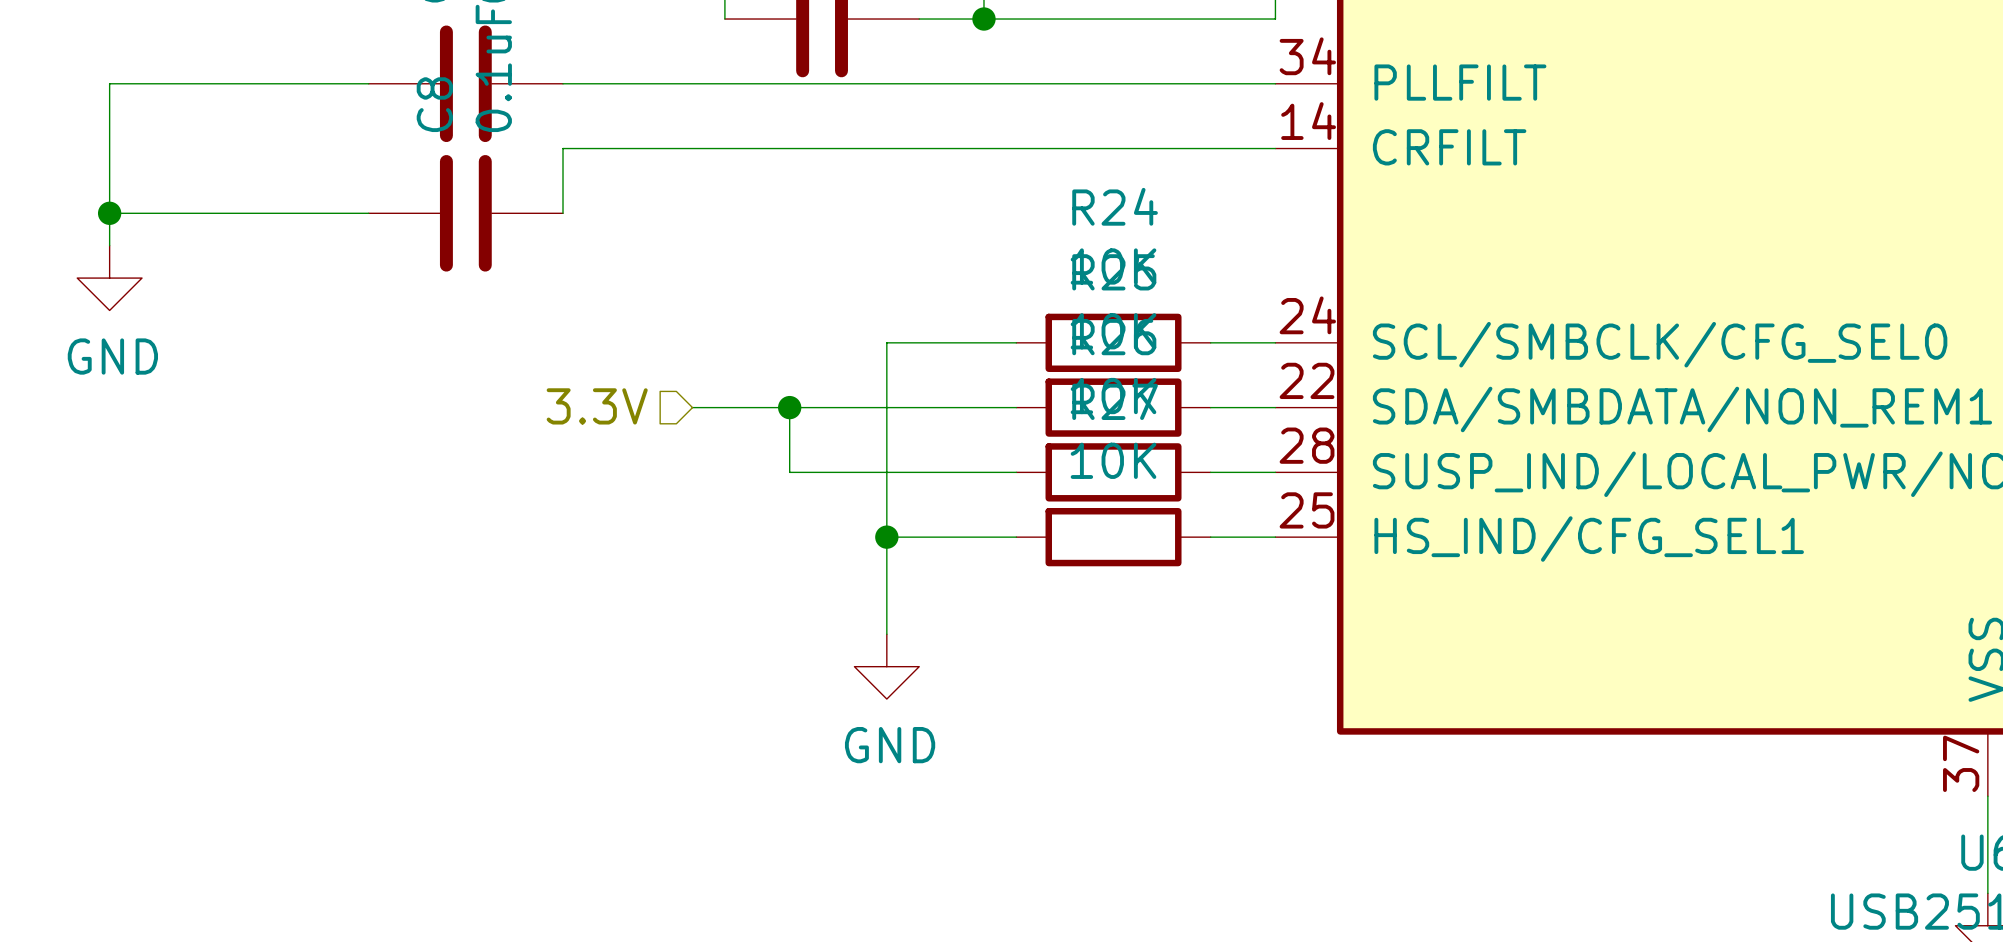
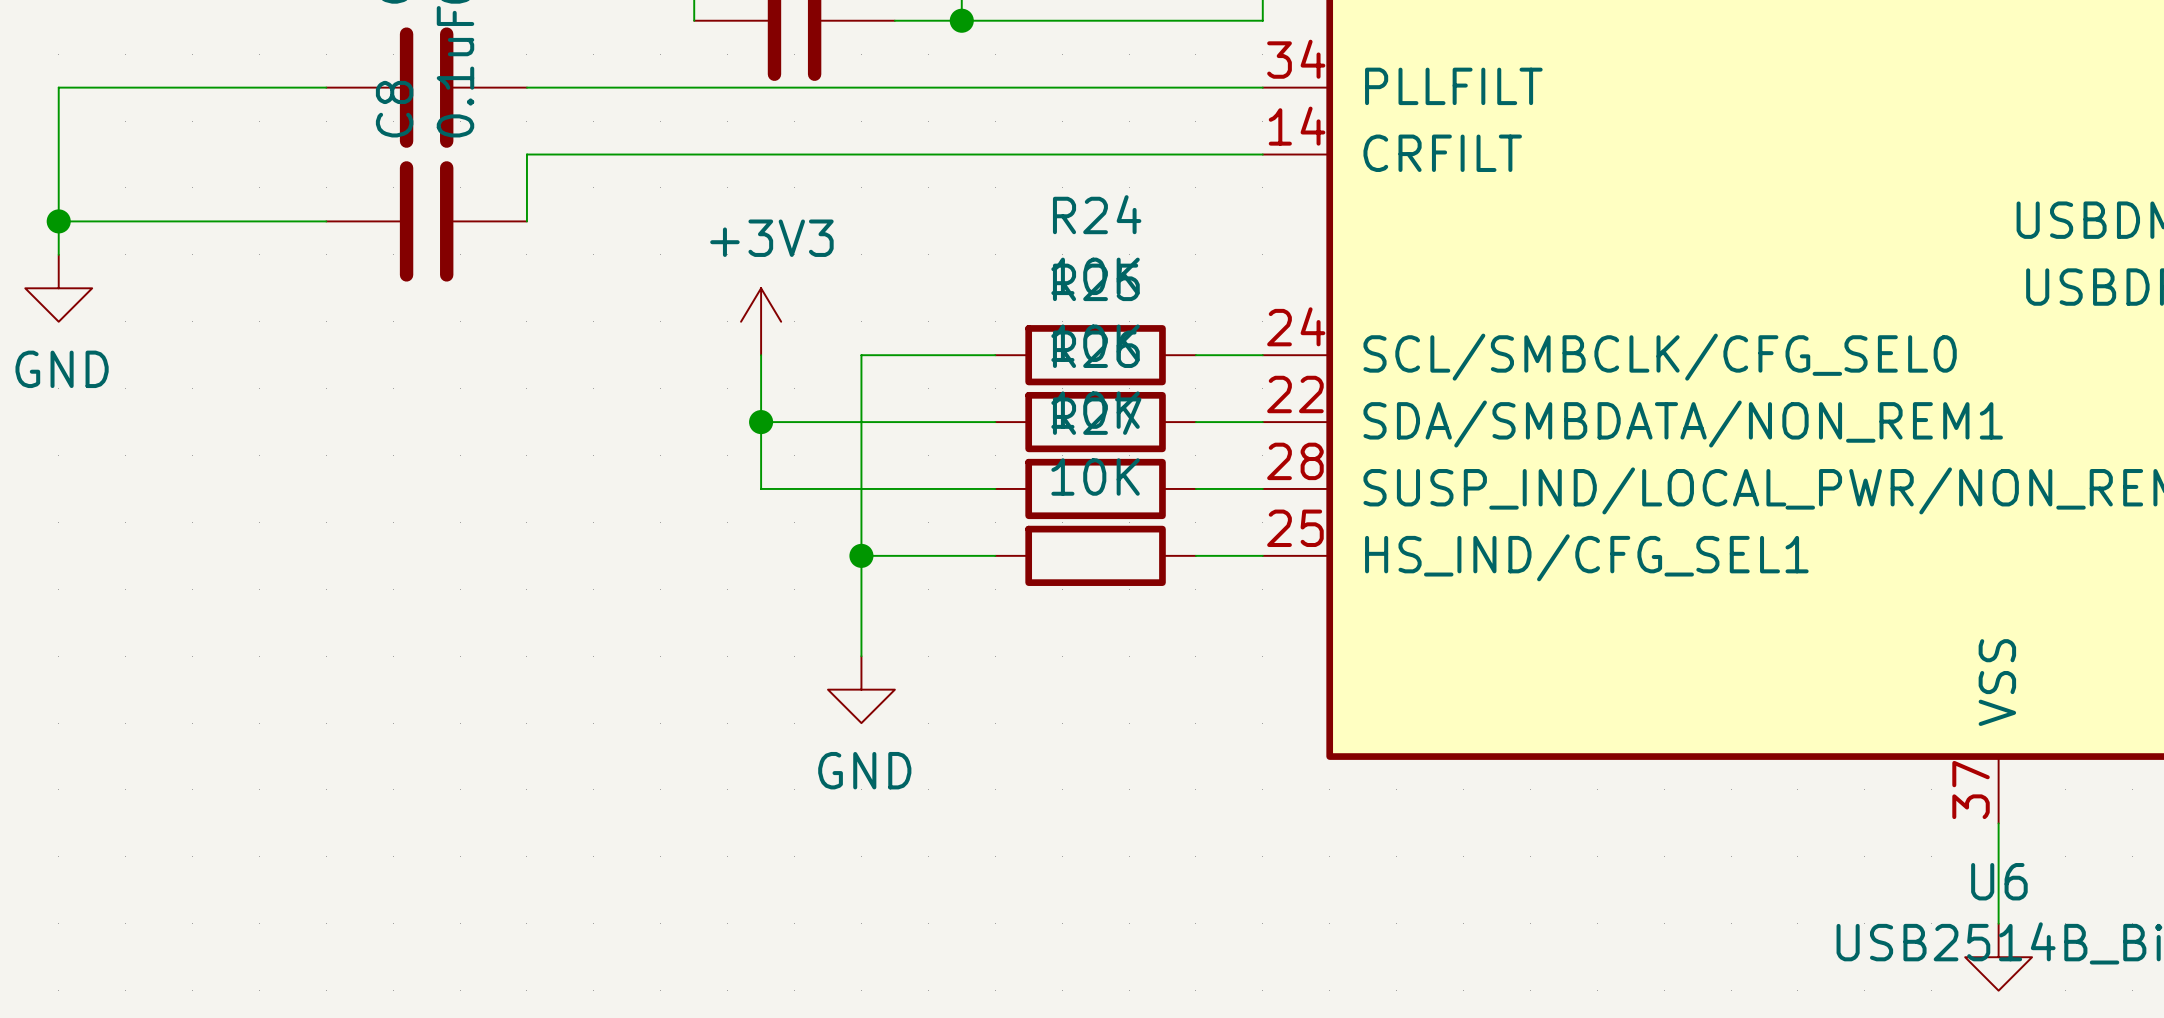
power symbol: none -> +3V3 (761, 321)
hierarchical label: 3.3V (597, 406) -> none
wire: (692, 407) (789, 407) -> (761, 355) (761, 422)

